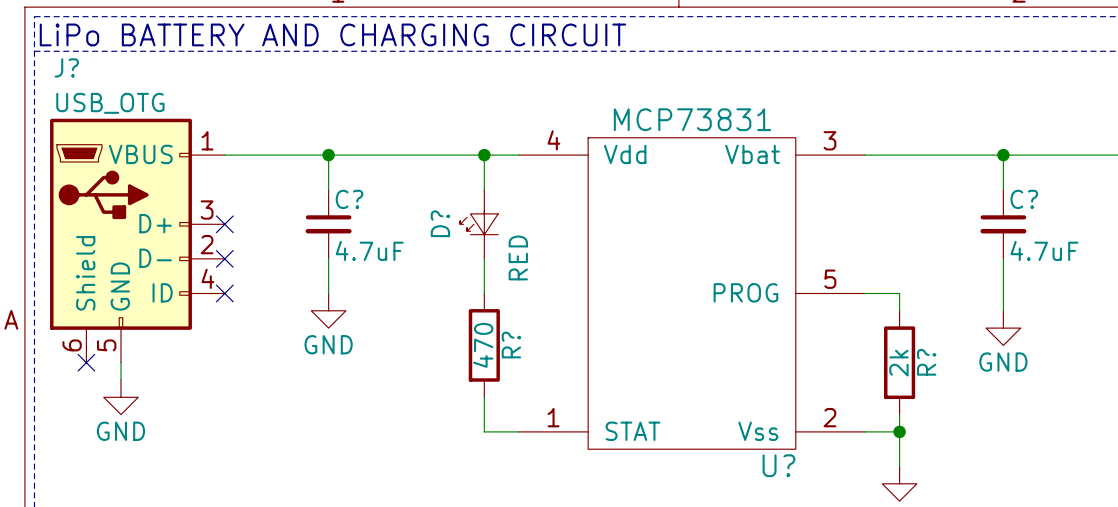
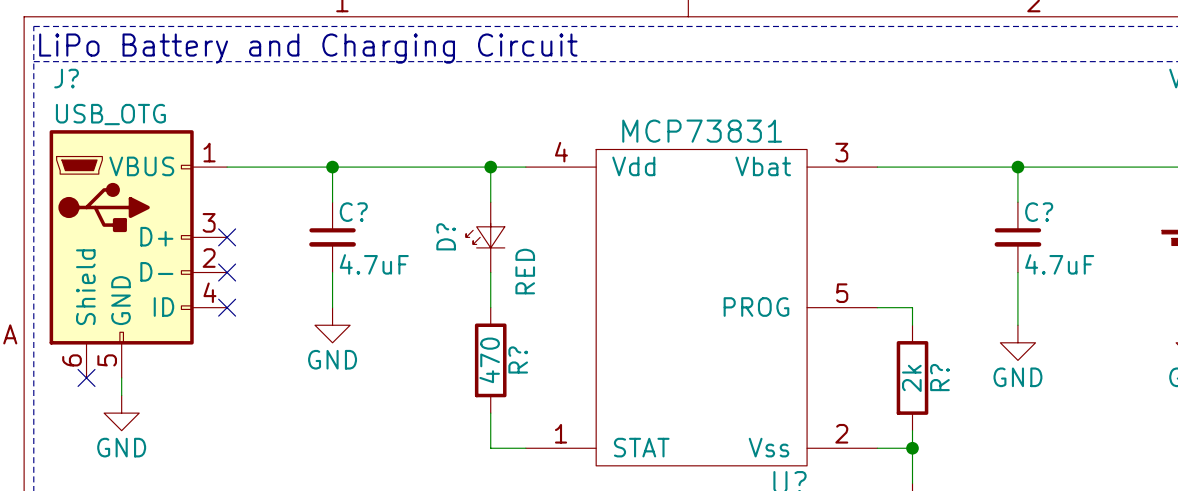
text: LiPo BATTERY AND CHARGING CIRCUIT (332, 34) -> LiPo Battery and Charging Circuit (308, 48)

